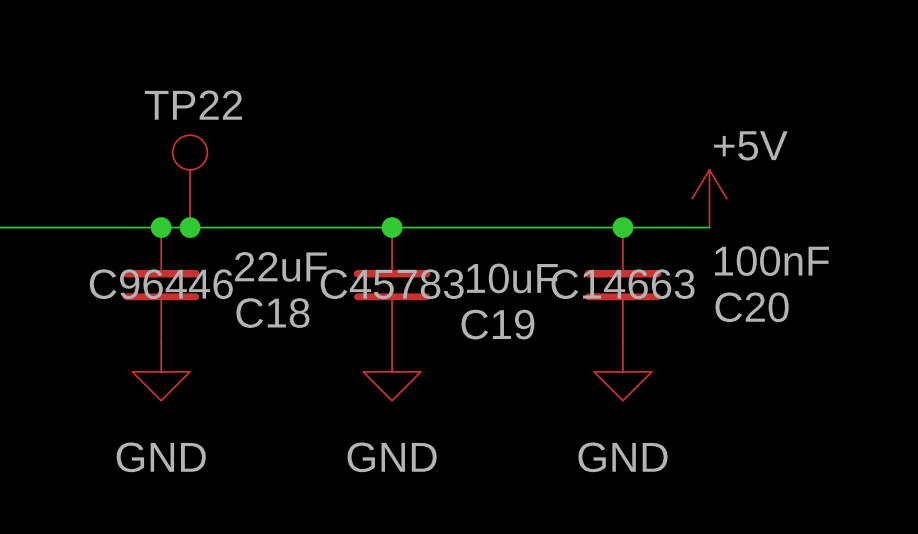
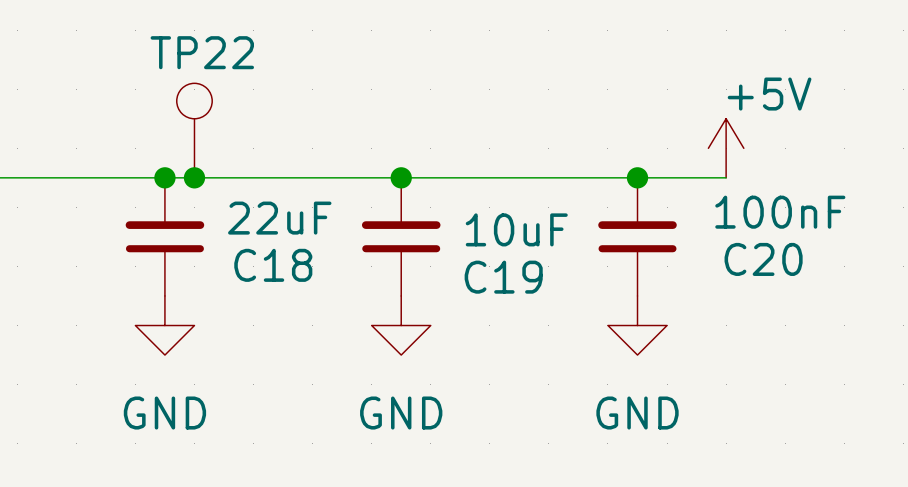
C18 text: C96446 (161, 284) -> none
C19 text: C45783 (392, 284) -> none
C20 text: C14663 (623, 284) -> none

